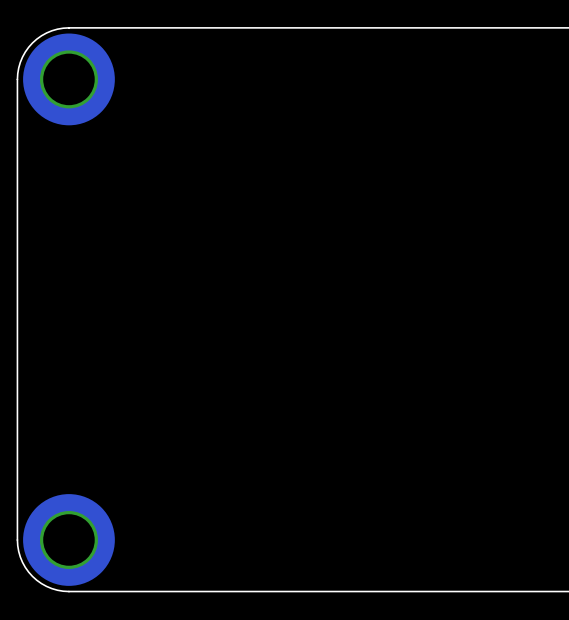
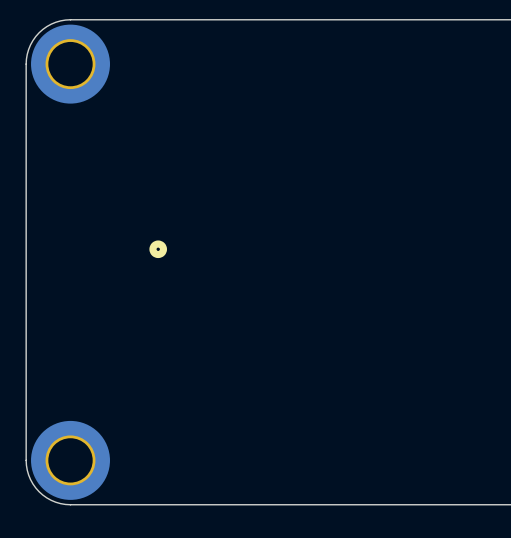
part: none -> (158, 249)

